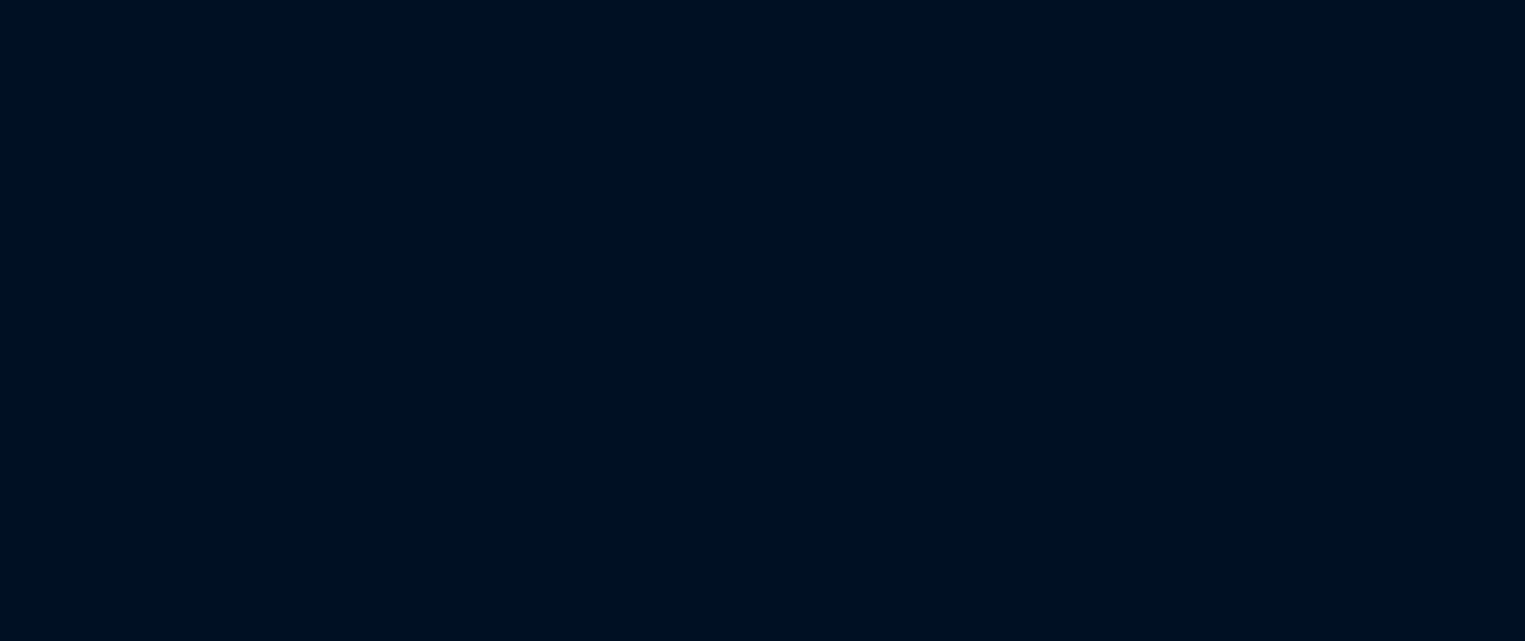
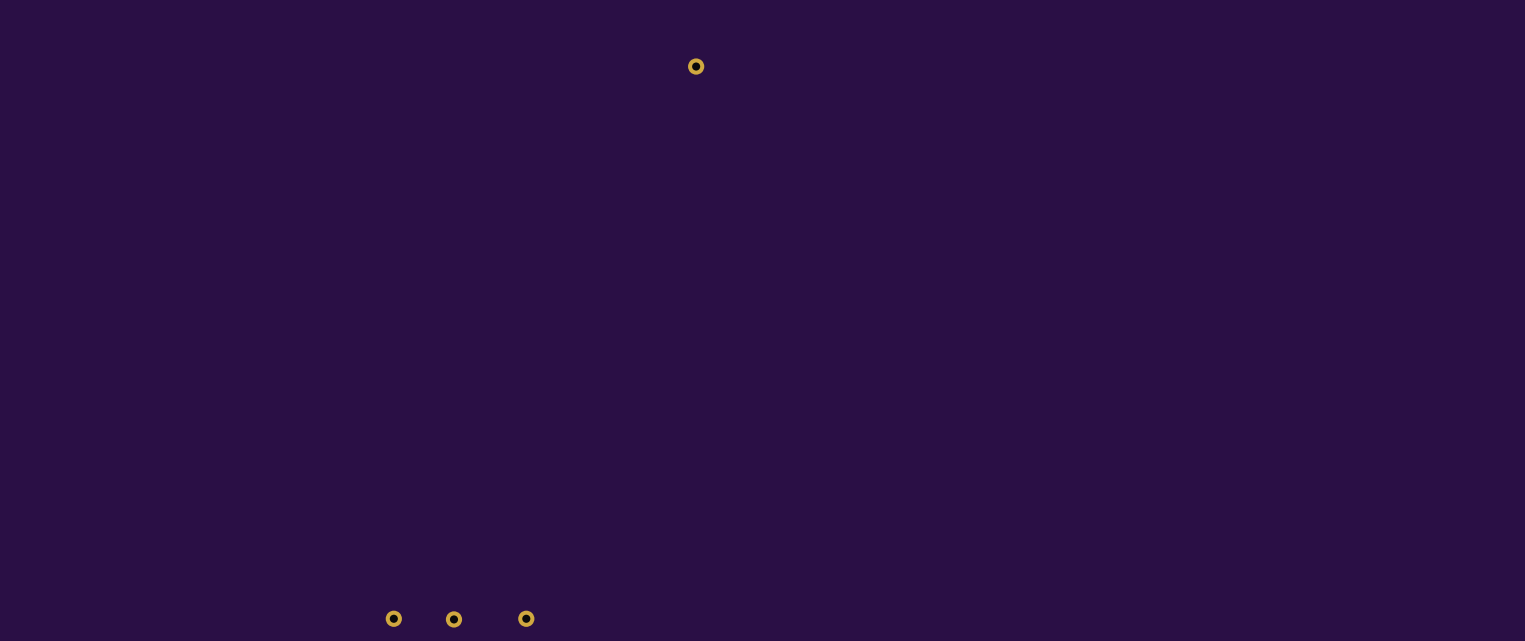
via: none -> (696, 66)
via: none -> (393, 618)
via: none -> (526, 618)
via: none -> (453, 619)

